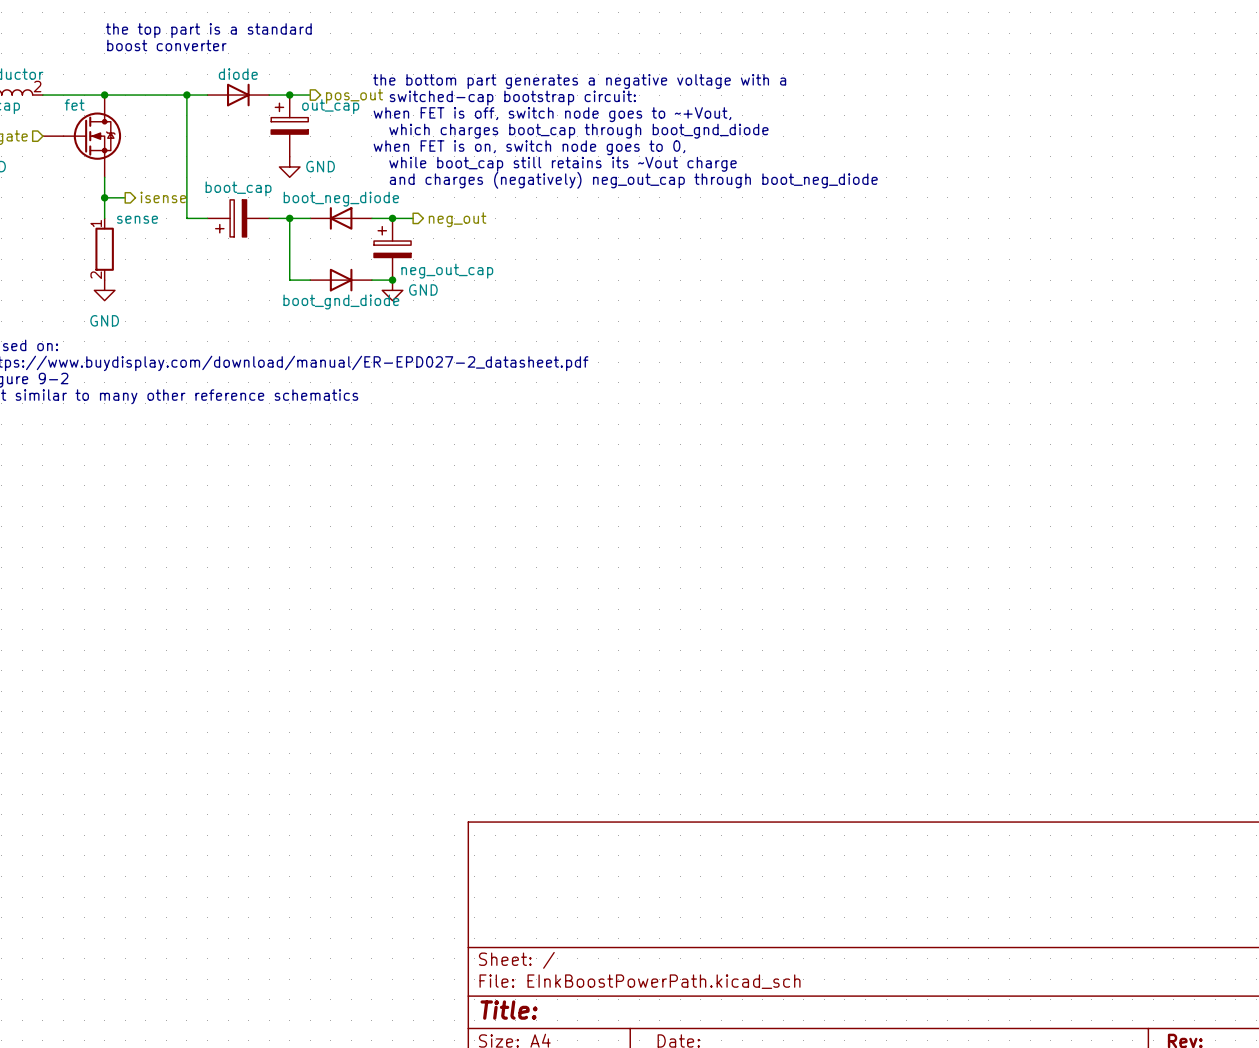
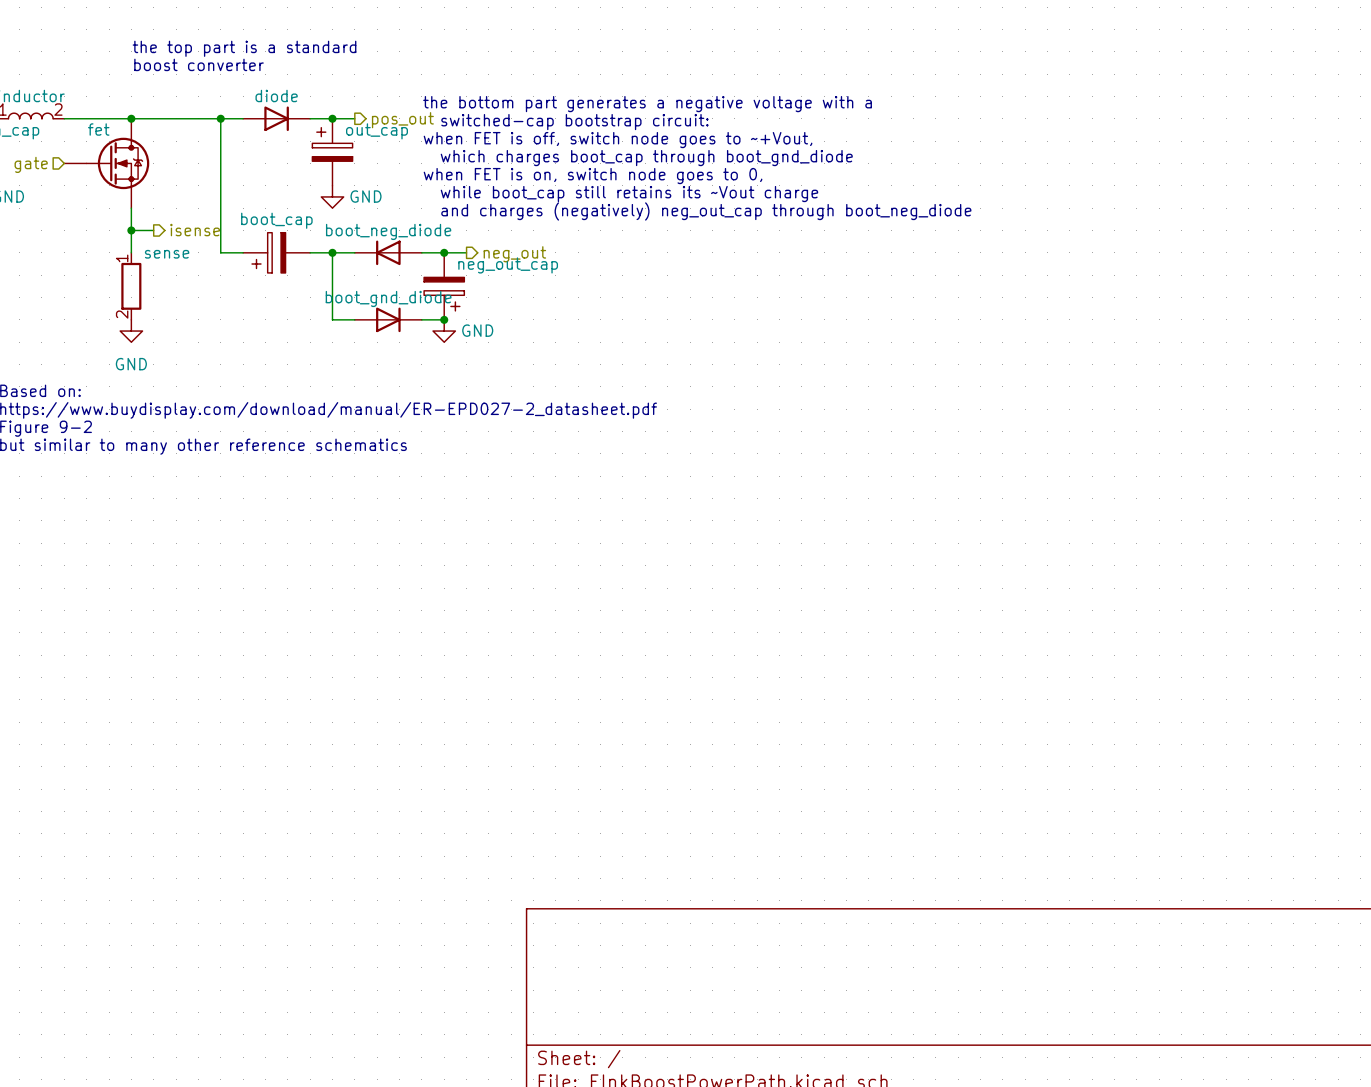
neg_out_cap rotation: 0° (392, 242) -> 180° (444, 294)
neg_out_cap name position: neg_out_cap (447, 271) -> neg_out_cap (508, 265)
boot_gnd_diode name position: boot_gnd_diode (341, 301) -> boot_gnd_diode (388, 298)

